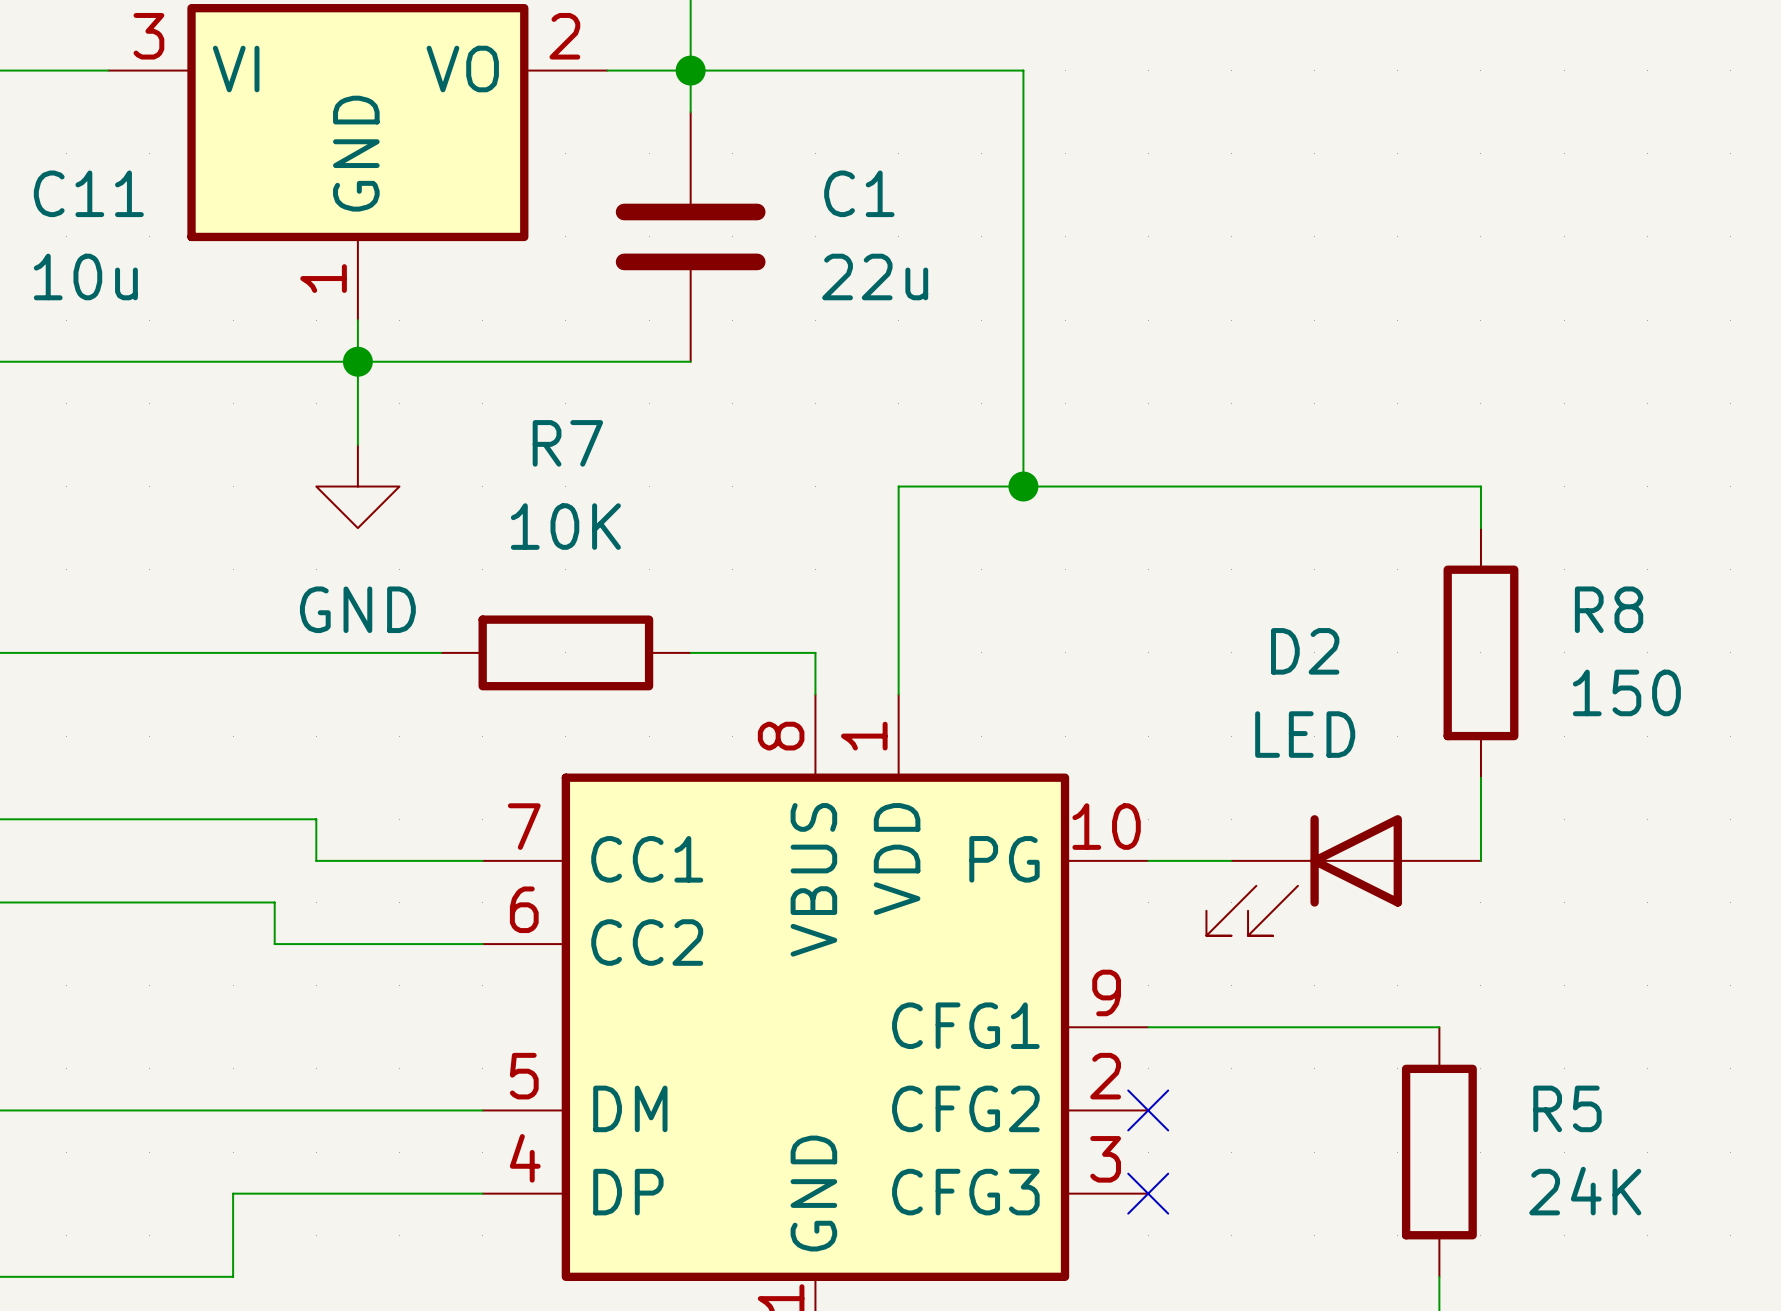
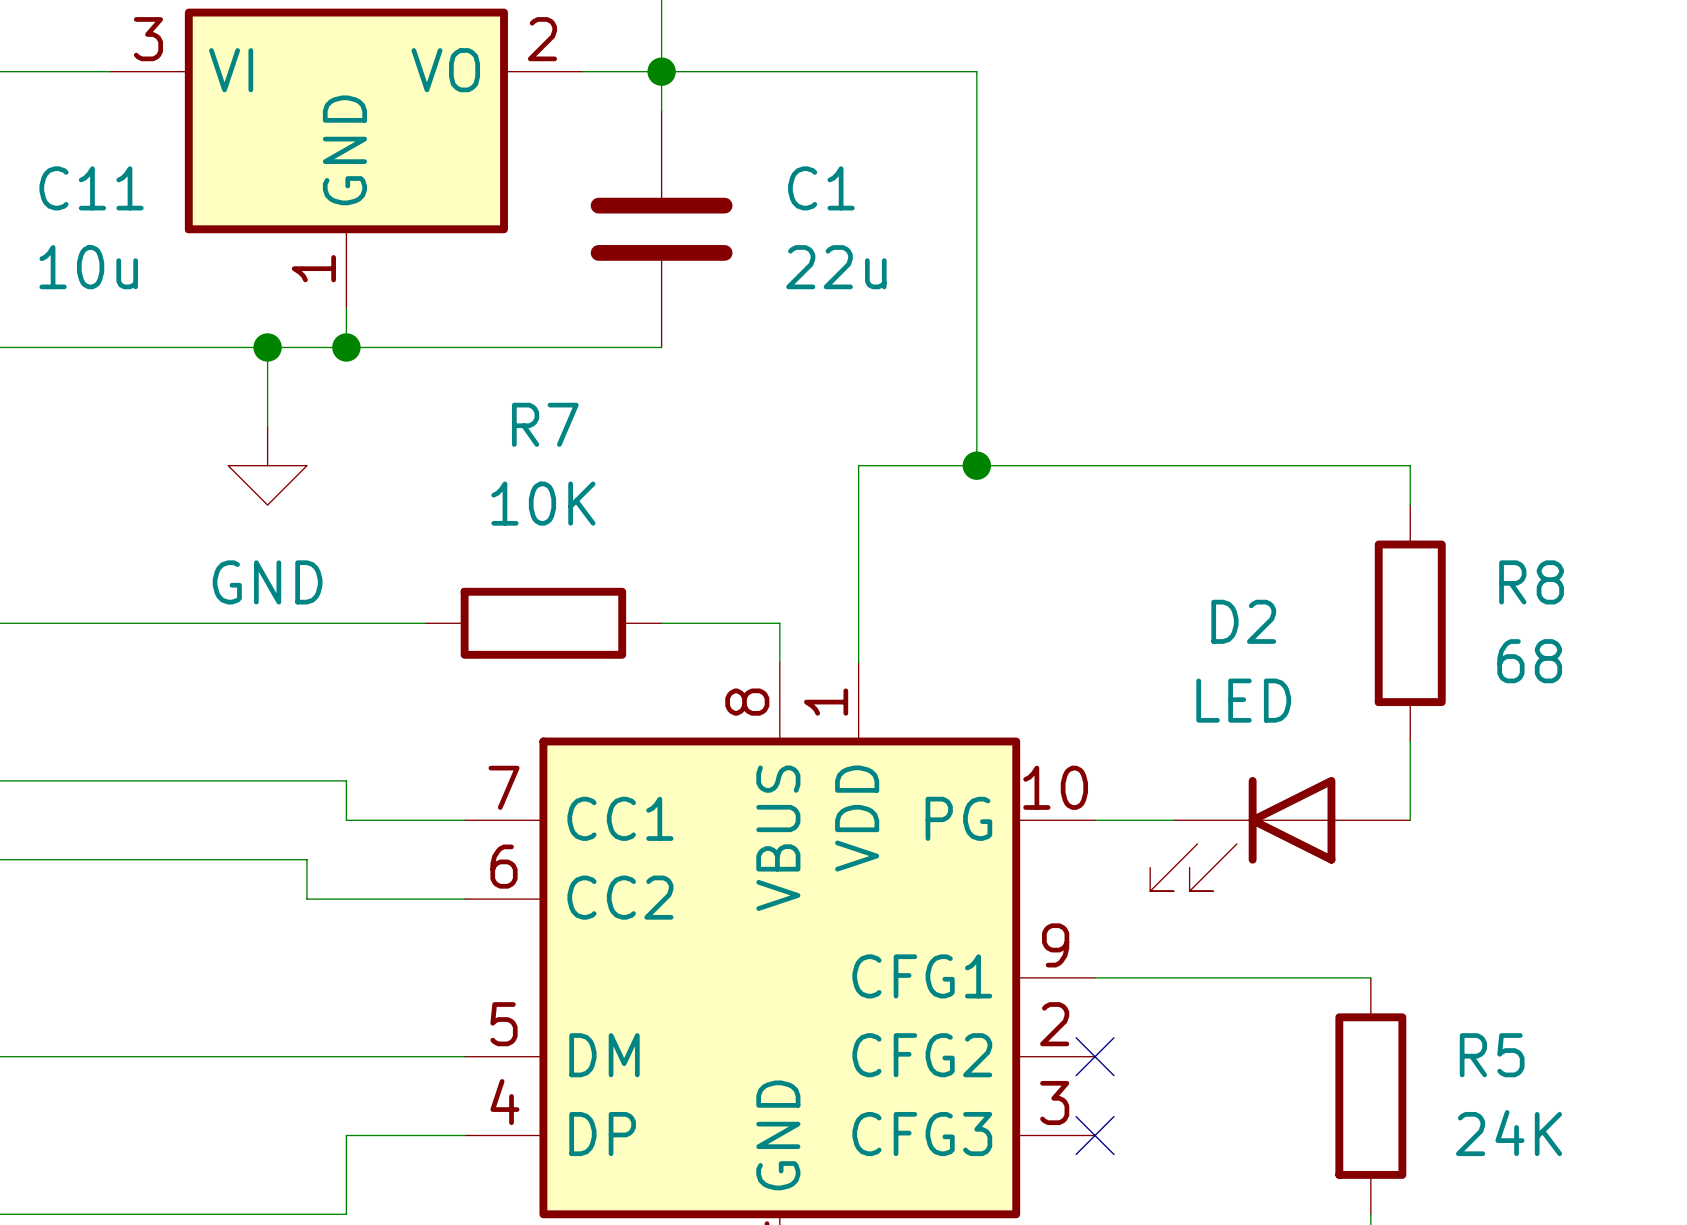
junction: none -> (267, 347)
wire: (357, 361) (357, 444) -> (267, 347) (267, 426)
power symbol position: GND (357, 486) -> GND (267, 465)
R8 value: 150 (1626, 692) -> 68 (1529, 661)
wire: (316, 819) (316, 860) (357, 860) -> (307, 780) (346, 780) (346, 820)
wire: (274, 902) (274, 944) (316, 944) -> (267, 859) (307, 859) (307, 899)
wire: (357, 1193) (233, 1193) (233, 1276) -> (346, 1135) (346, 1214) (228, 1214)

